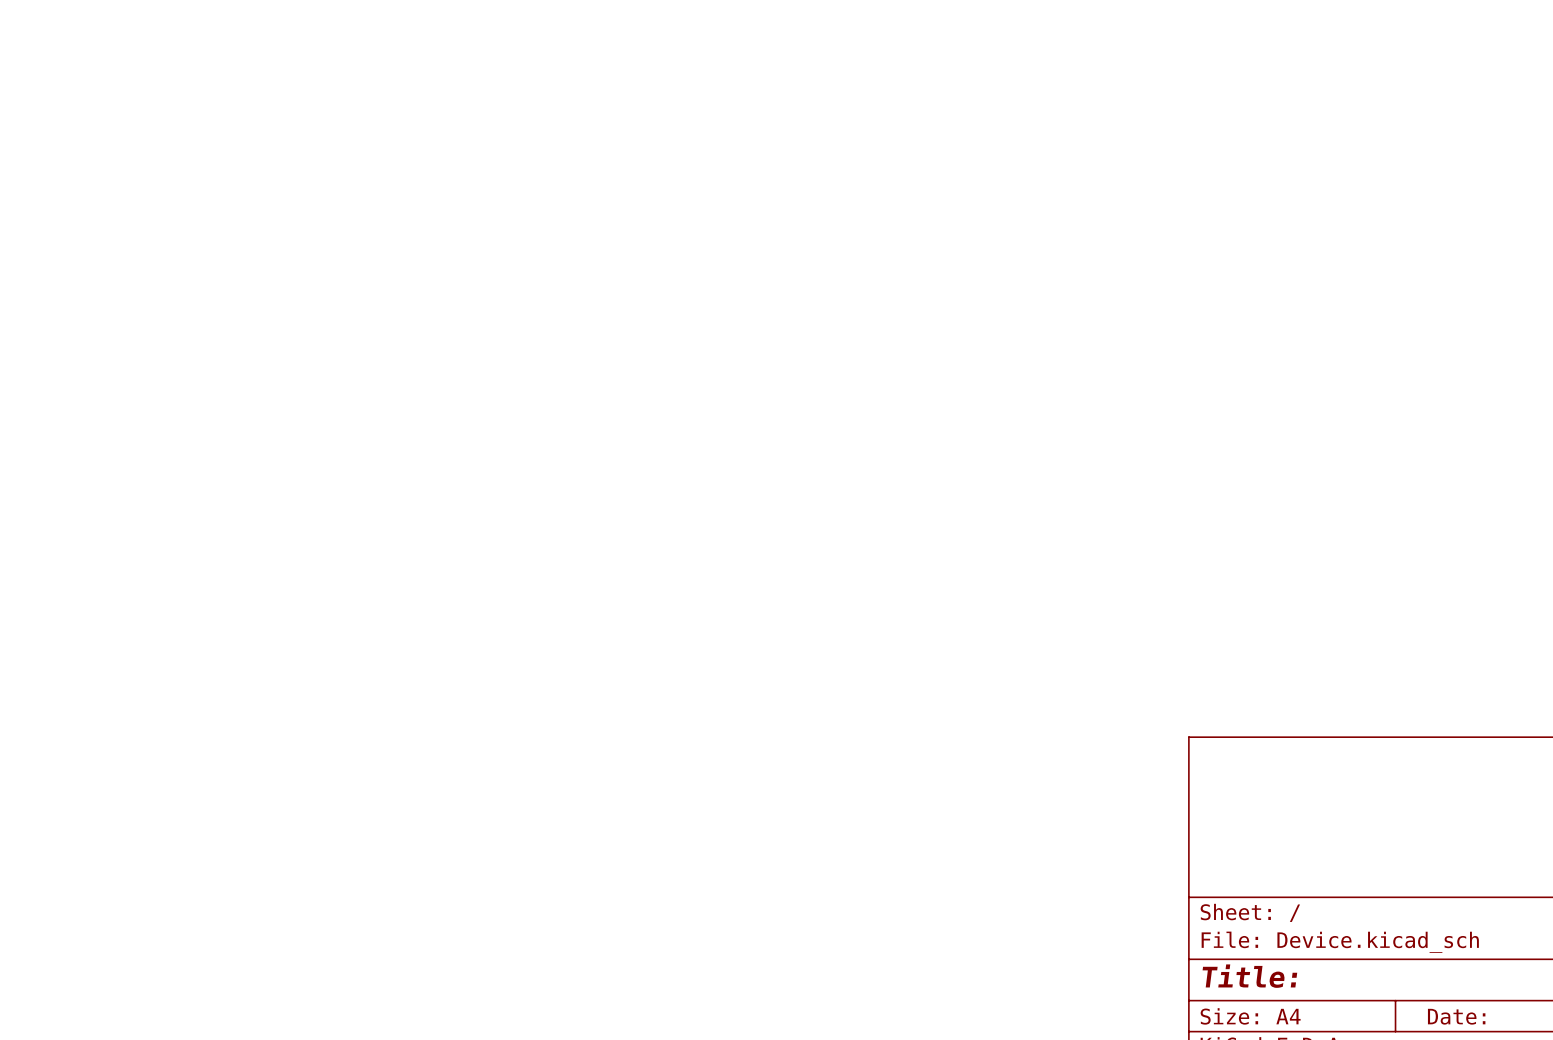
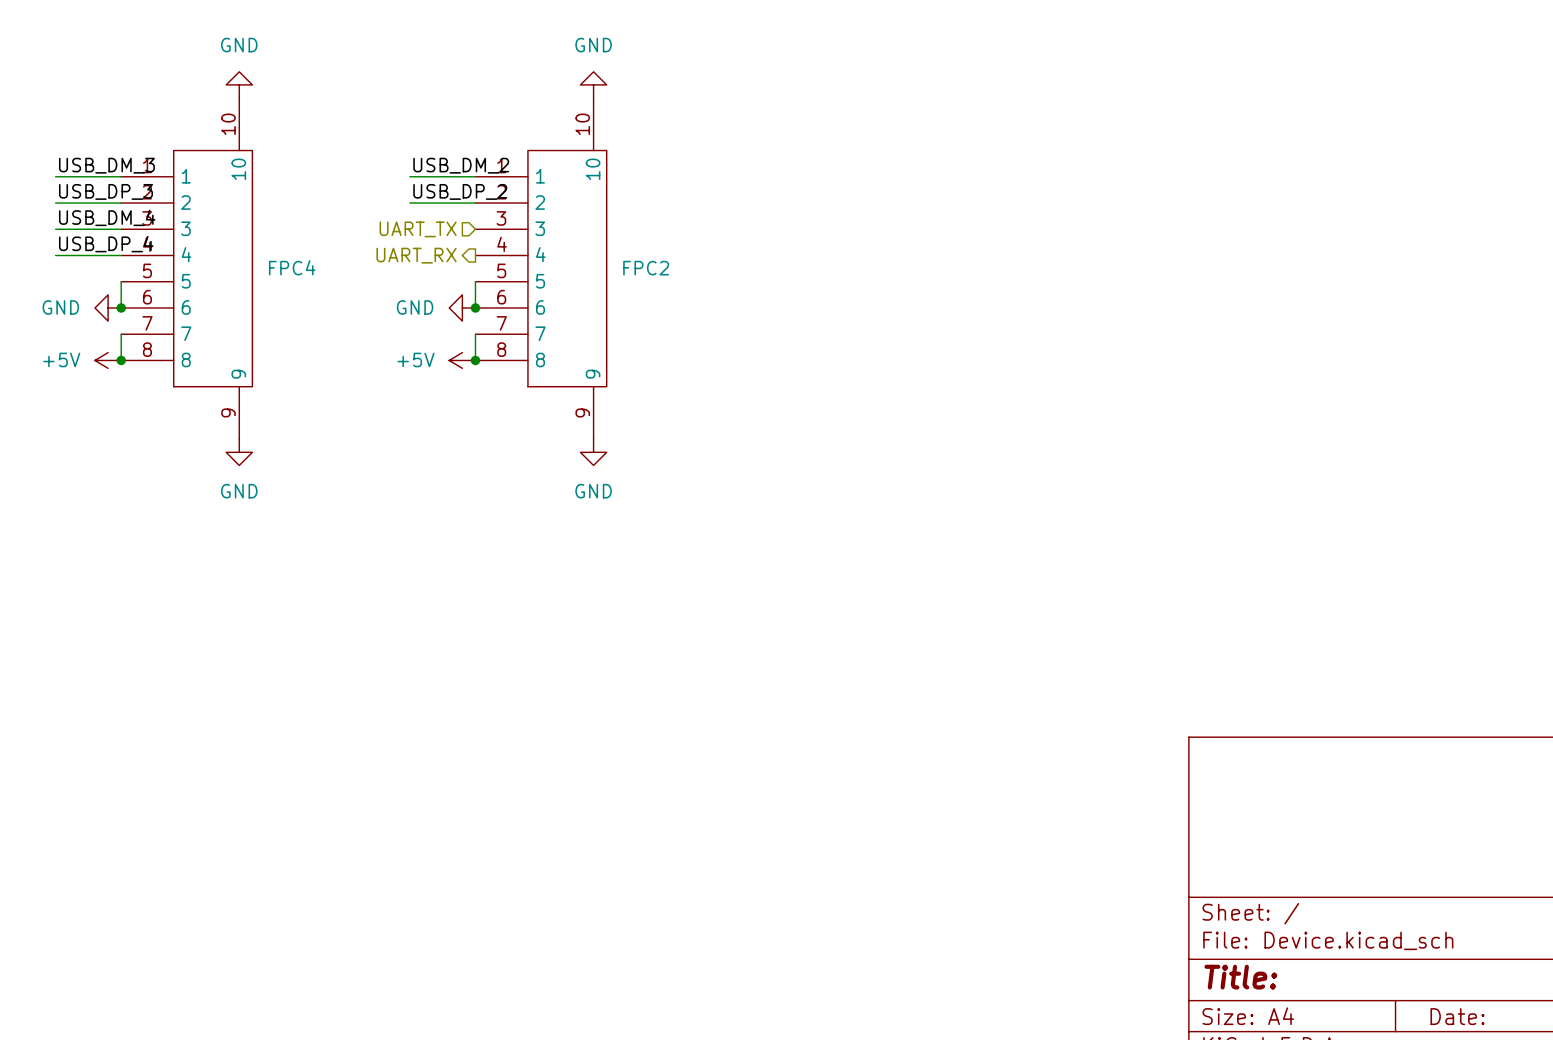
power symbol: none -> GND (239, 84)
power symbol: none -> GND (593, 84)
label: none -> USB_DM_3 (106, 165)
label: none -> USB_DM_2 (461, 165)
wire: none -> (55, 176) (121, 176)
wire: none -> (409, 176) (475, 176)
label: none -> USB_DP_3 (105, 191)
label: none -> USB_DP_2 (460, 191)
wire: none -> (55, 203) (121, 203)
wire: none -> (409, 203) (475, 203)
label: none -> USB_DM_4 (107, 217)
wire: none -> (55, 229) (121, 229)
hierarchical label: none -> UART_TX (418, 229)
label: none -> USB_DP_4 (106, 244)
wire: none -> (55, 255) (121, 255)
hierarchical label: none -> UART_RX (416, 255)
FPC4: none -> (186, 268)
FPC2: none -> (541, 268)
wire: none -> (121, 281) (121, 307)
wire: none -> (475, 281) (475, 307)
power symbol: none -> GND (108, 307)
junction: none -> (121, 307)
power symbol: none -> GND (462, 307)
junction: none -> (475, 307)
wire: none -> (121, 334) (121, 360)
wire: none -> (475, 334) (475, 360)
power symbol: none -> +5V (108, 360)
junction: none -> (121, 360)
power symbol: none -> +5V (462, 360)
junction: none -> (475, 360)
power symbol: none -> GND (239, 452)
power symbol: none -> GND (593, 452)

